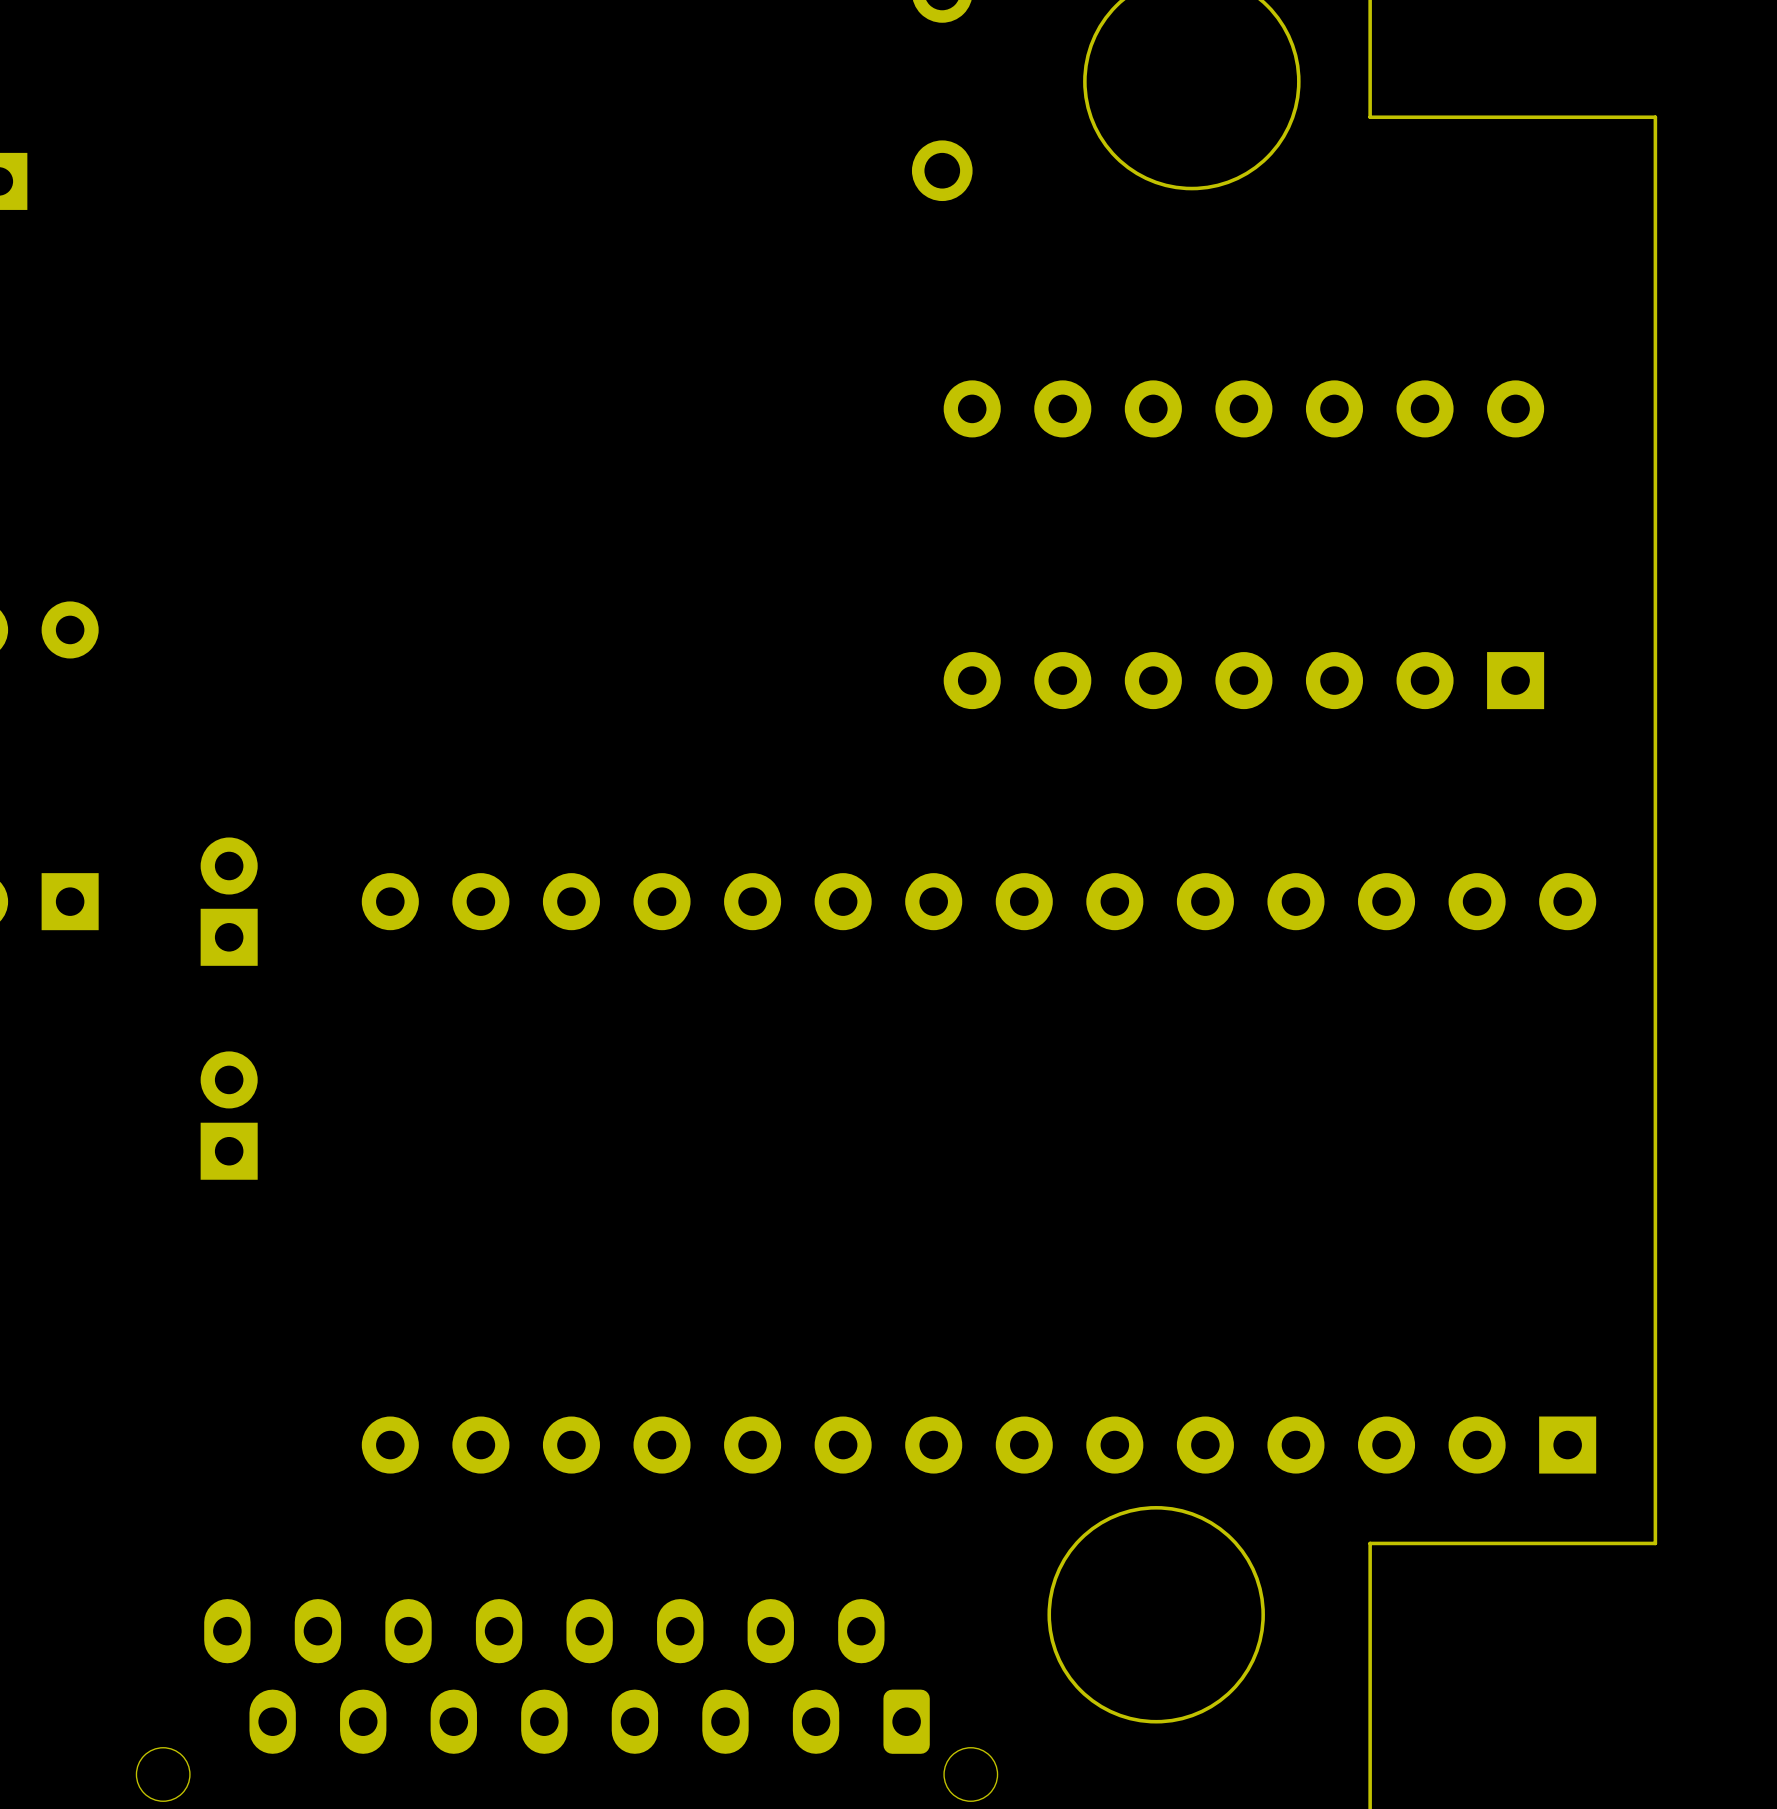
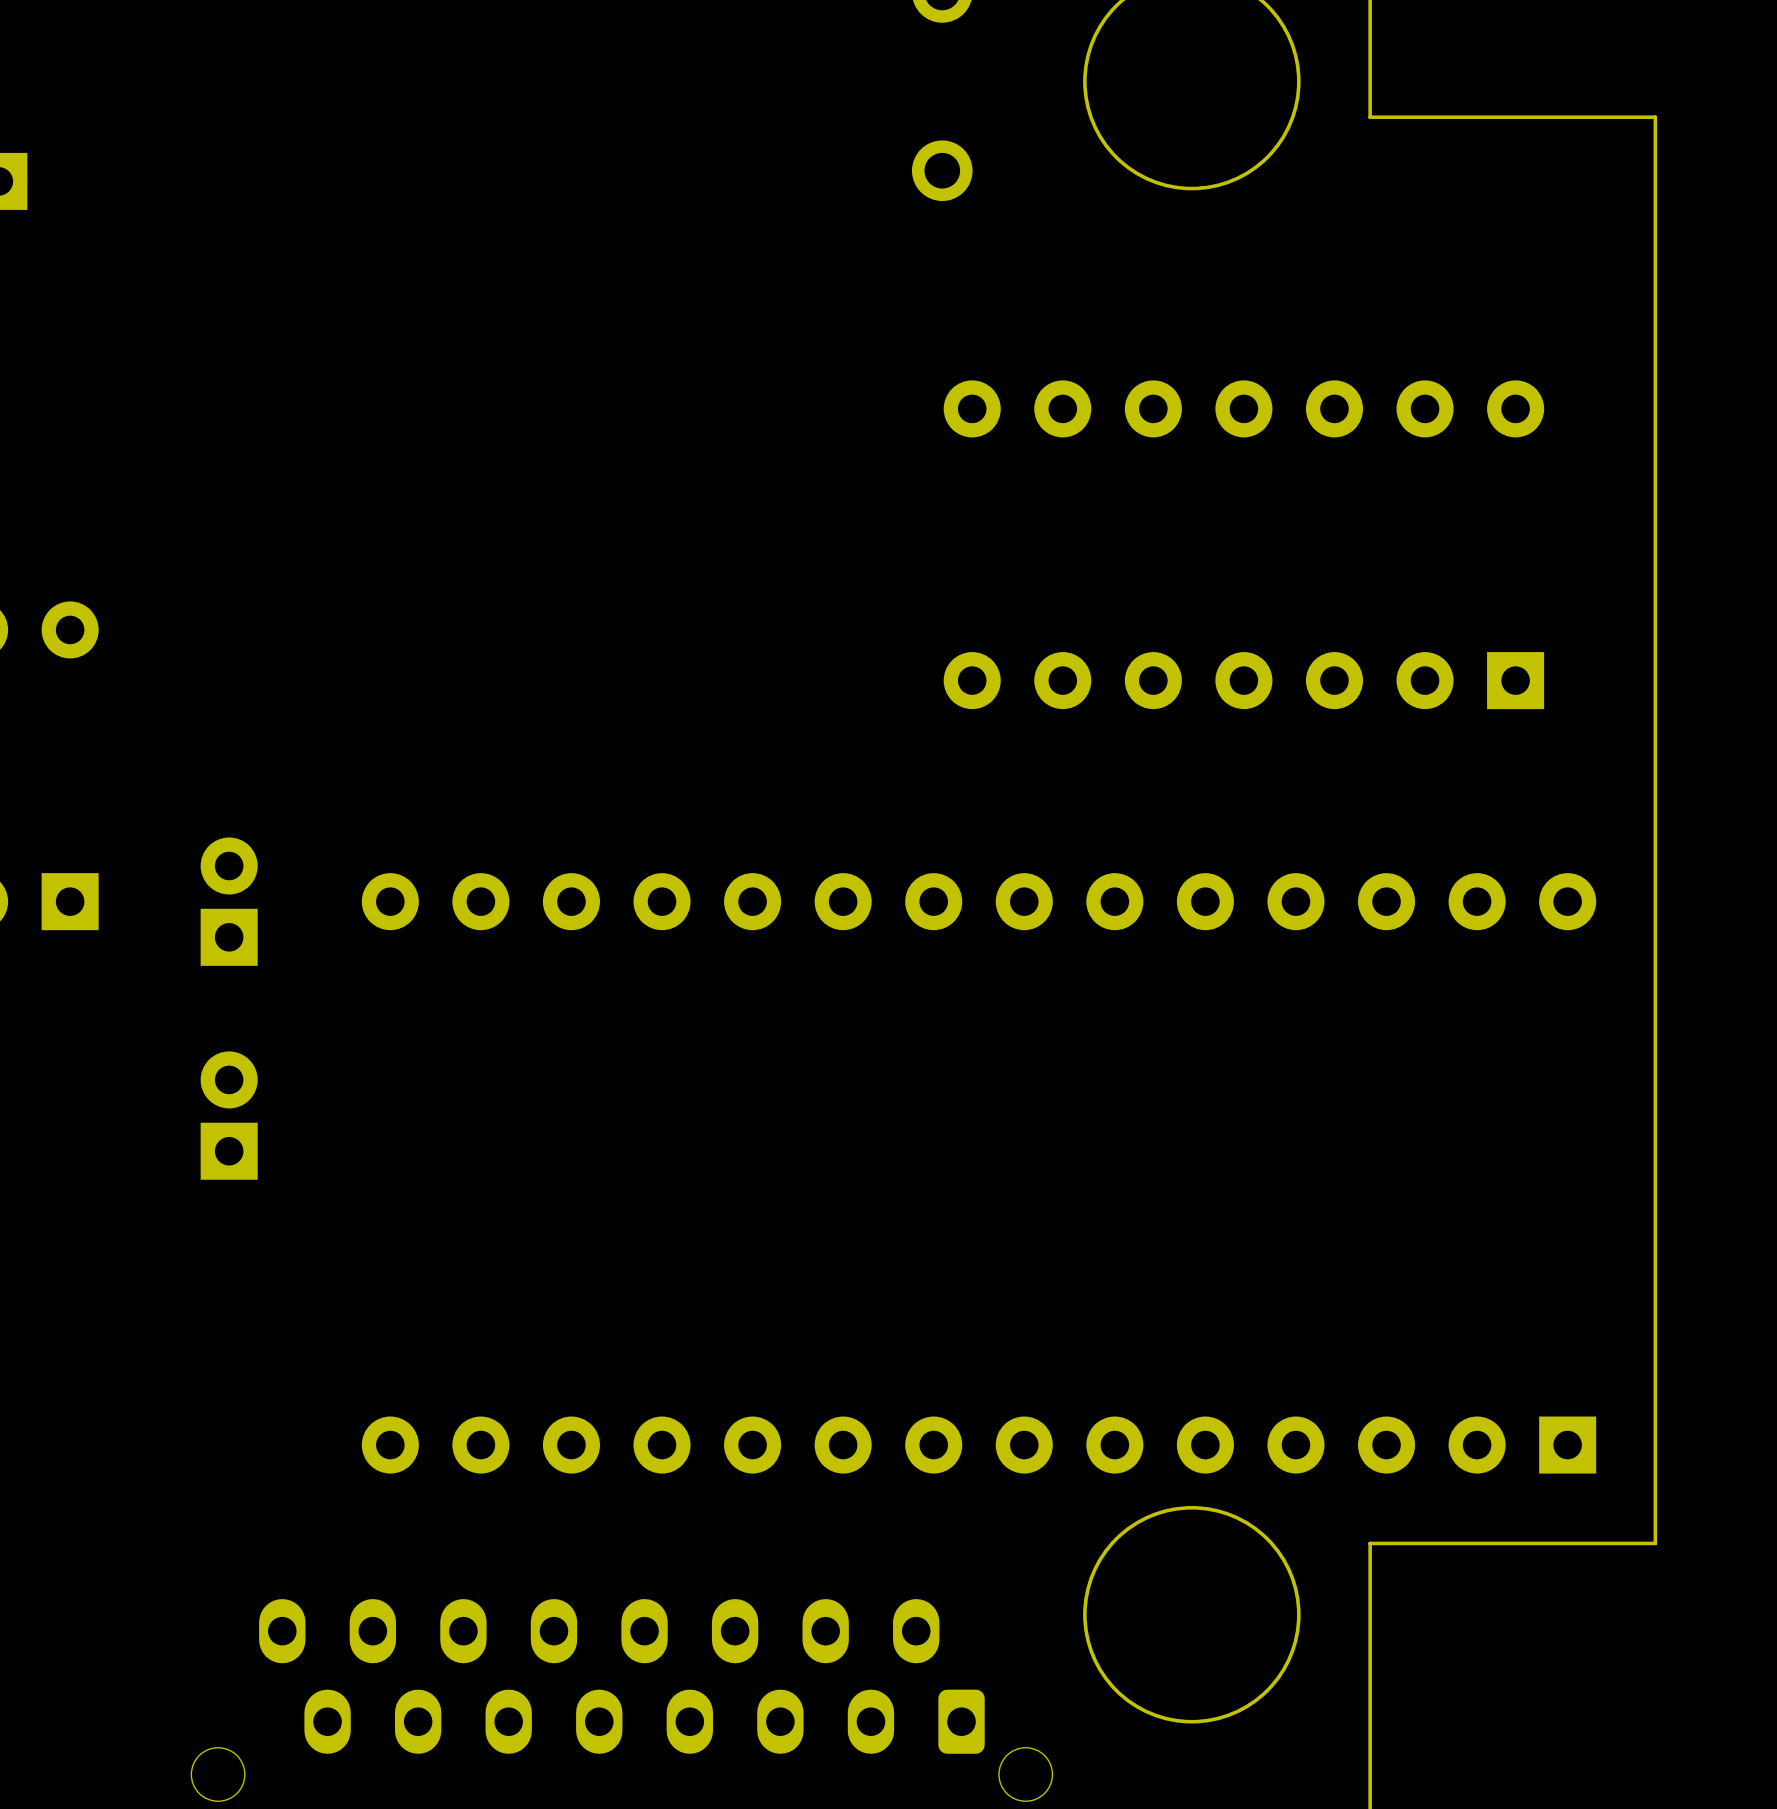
round board edge position: (1156, 1614) -> (1191, 1614)
part position: (567, 1700) -> (621, 1700)

